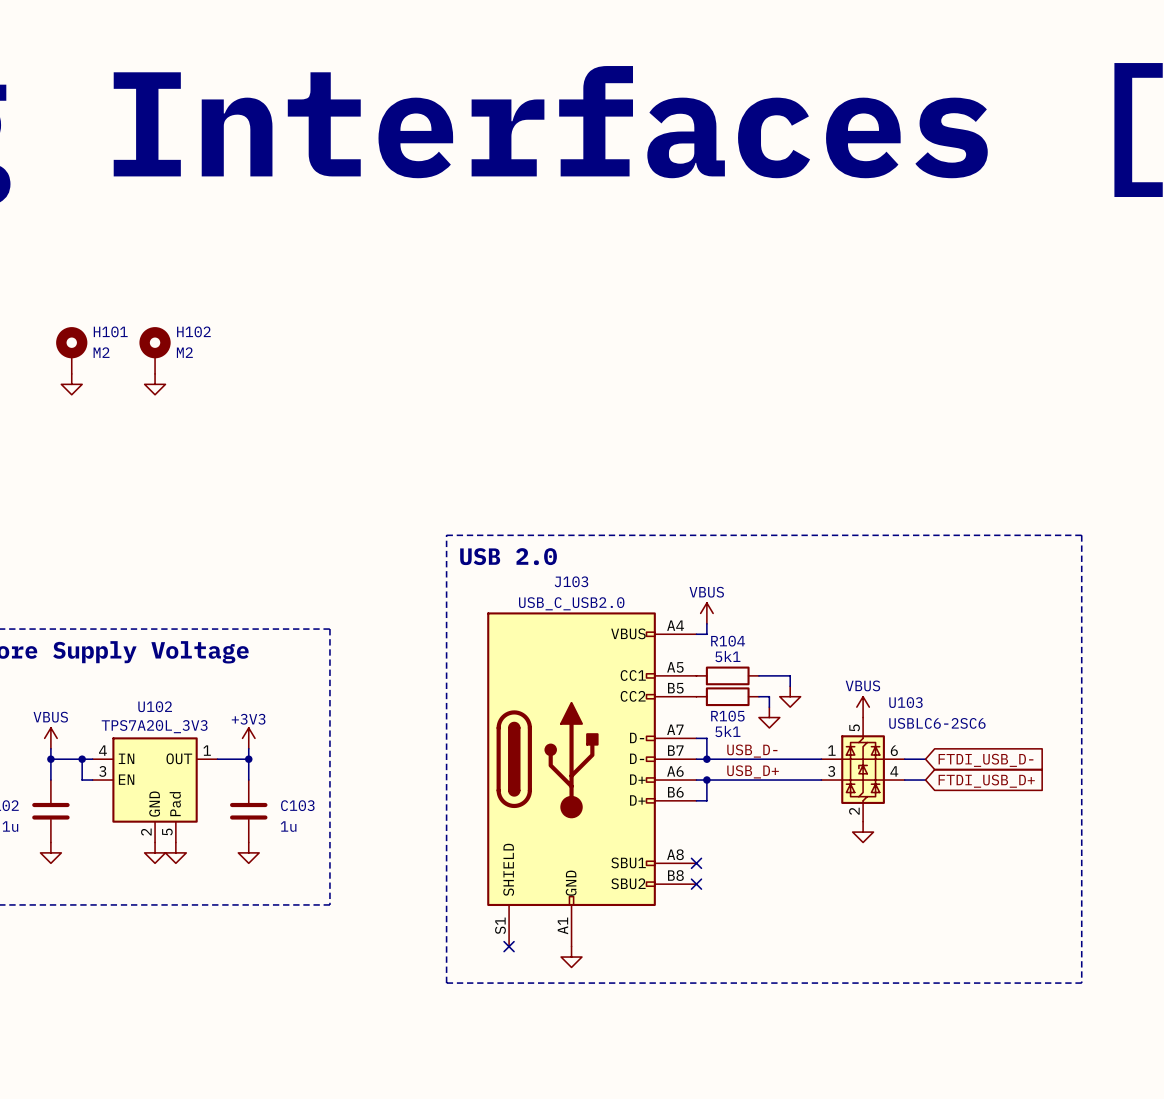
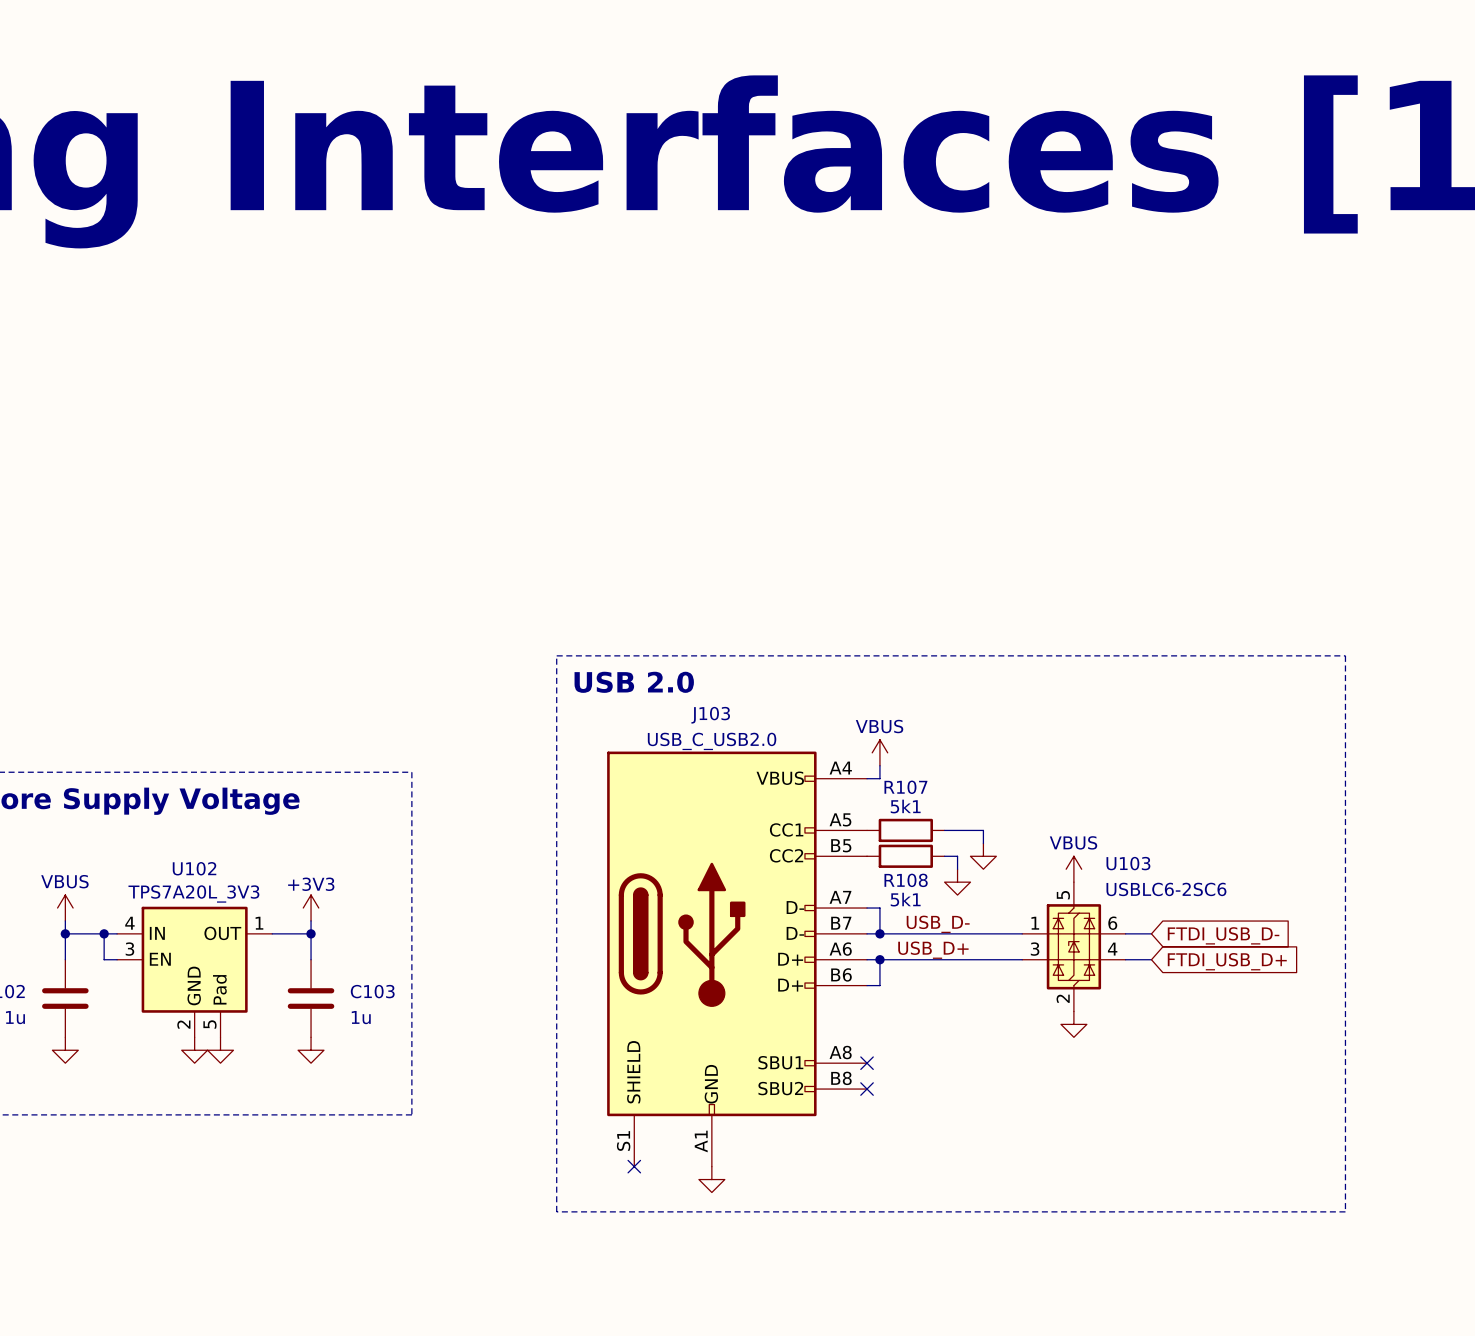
H101: M2 (71, 350) -> none
H102: M2 (155, 350) -> none
power symbol: (71, 384) -> none
power symbol: (155, 384) -> none
R104 name: R104 (728, 641) -> R107 (905, 787)
R105 name: R105 (727, 716) -> R108 (906, 880)

